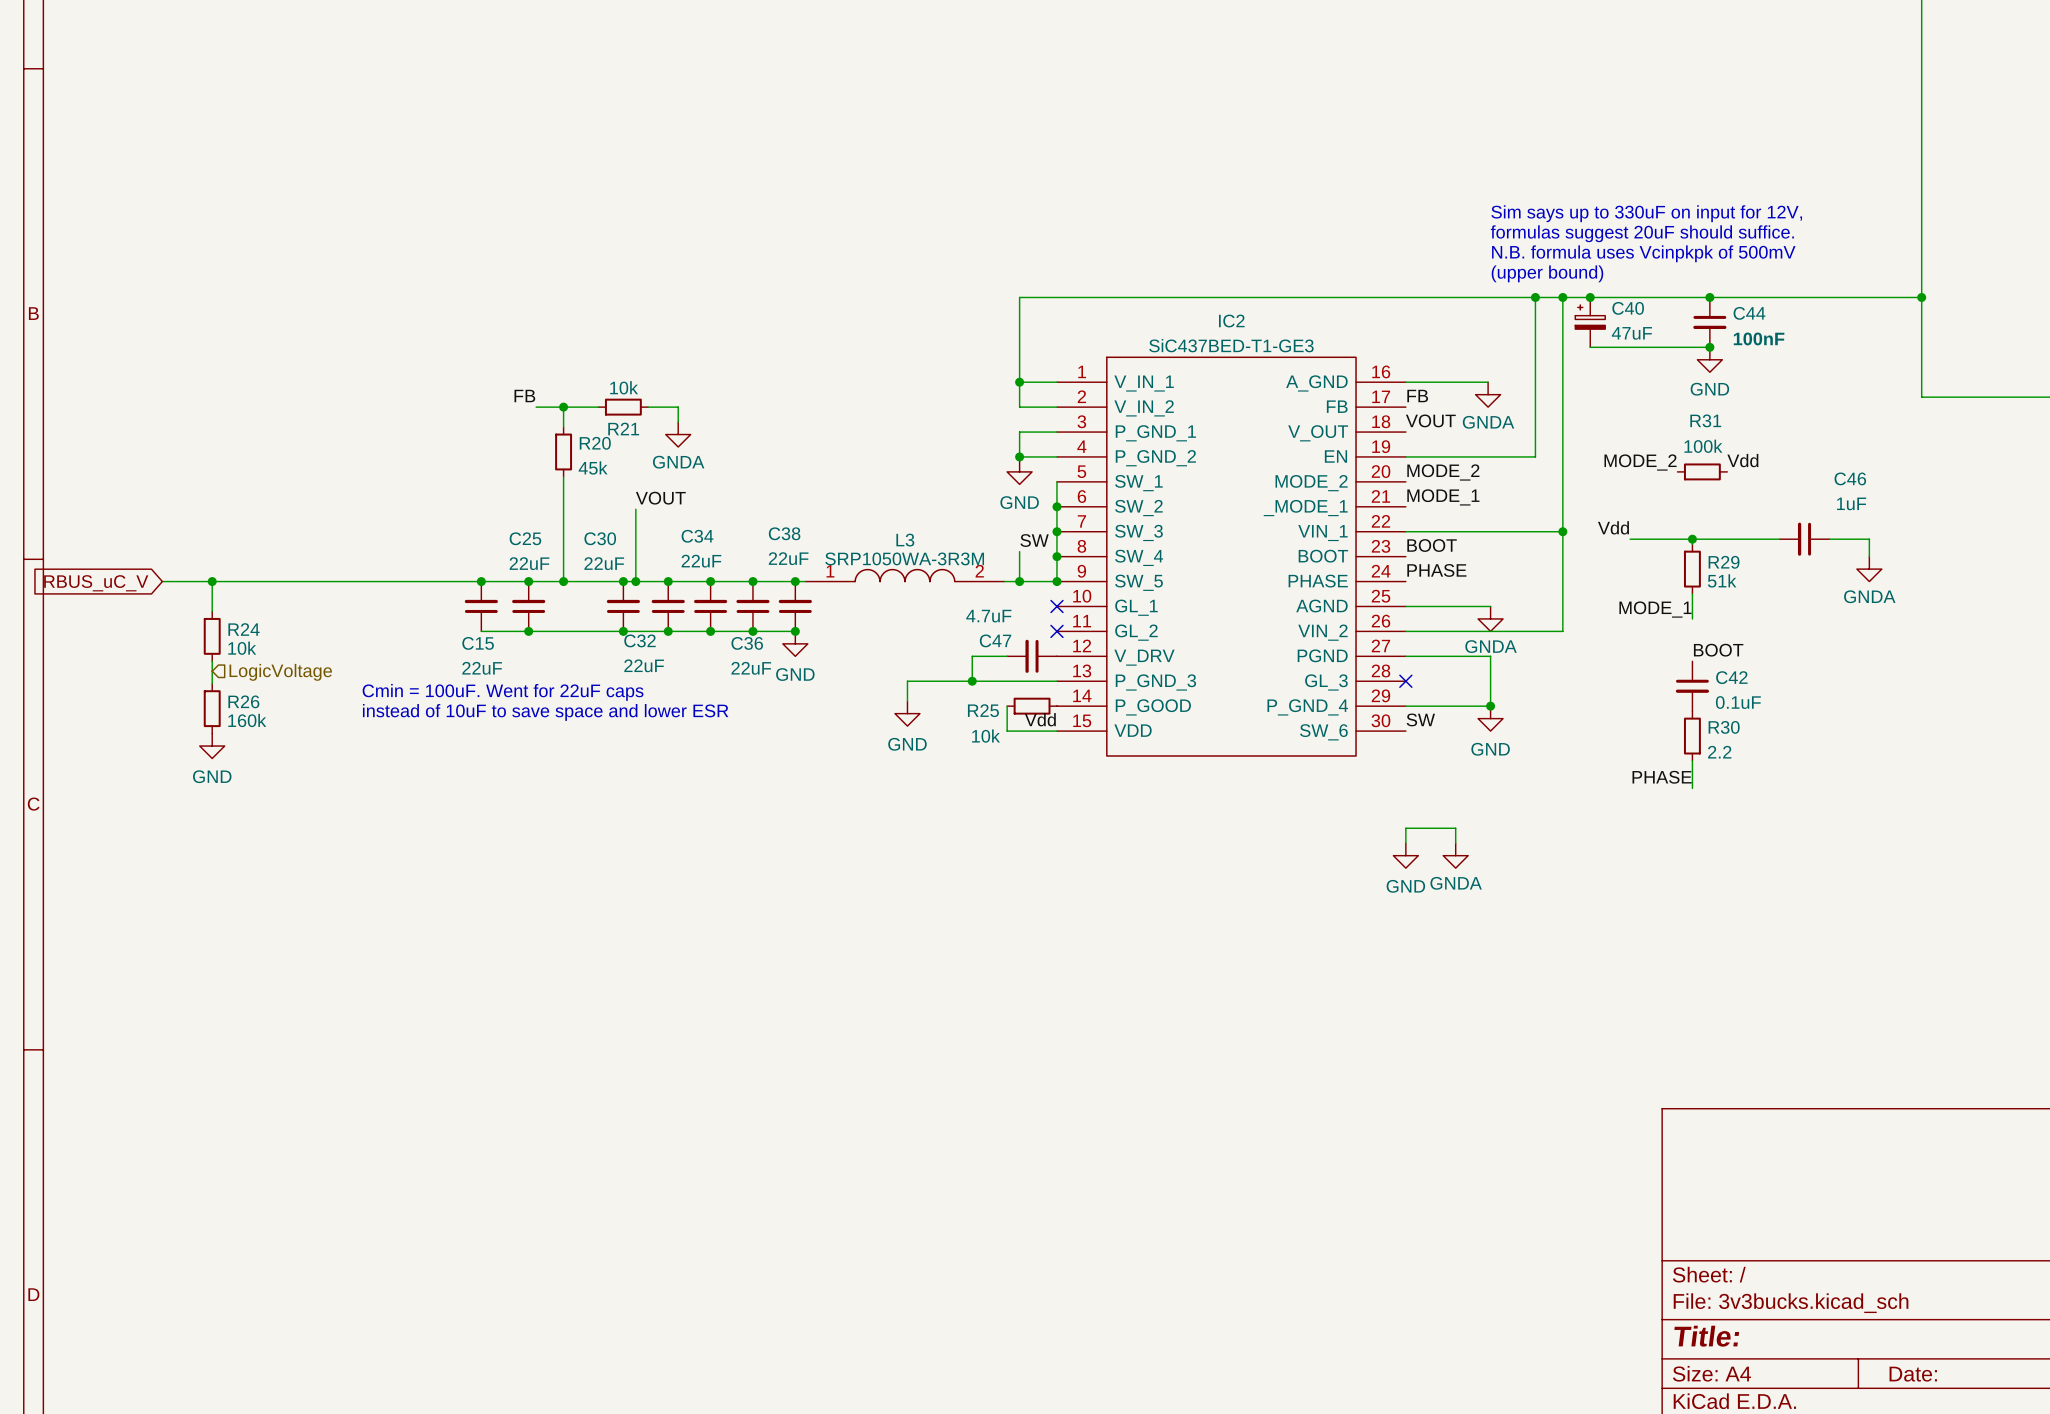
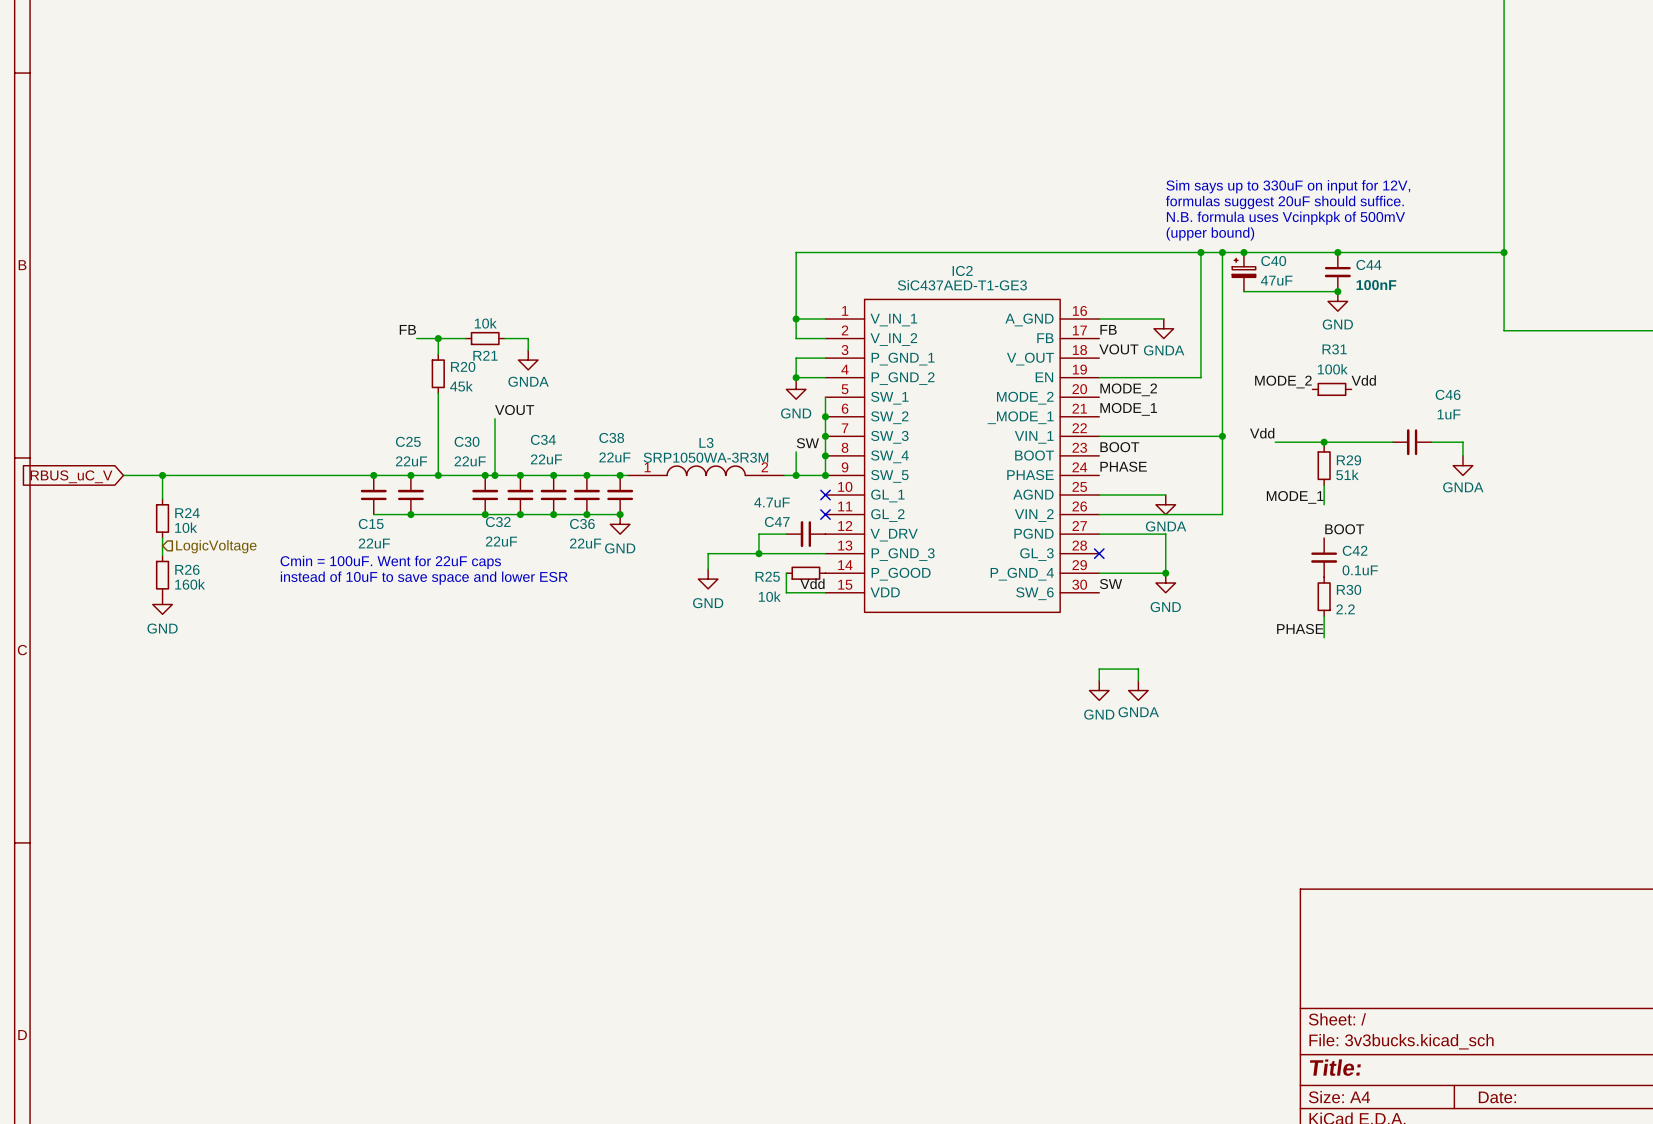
IC2 value: SiC437BED-T1-GE3 (1231, 345) -> SiC437AED-T1-GE3 (962, 285)

